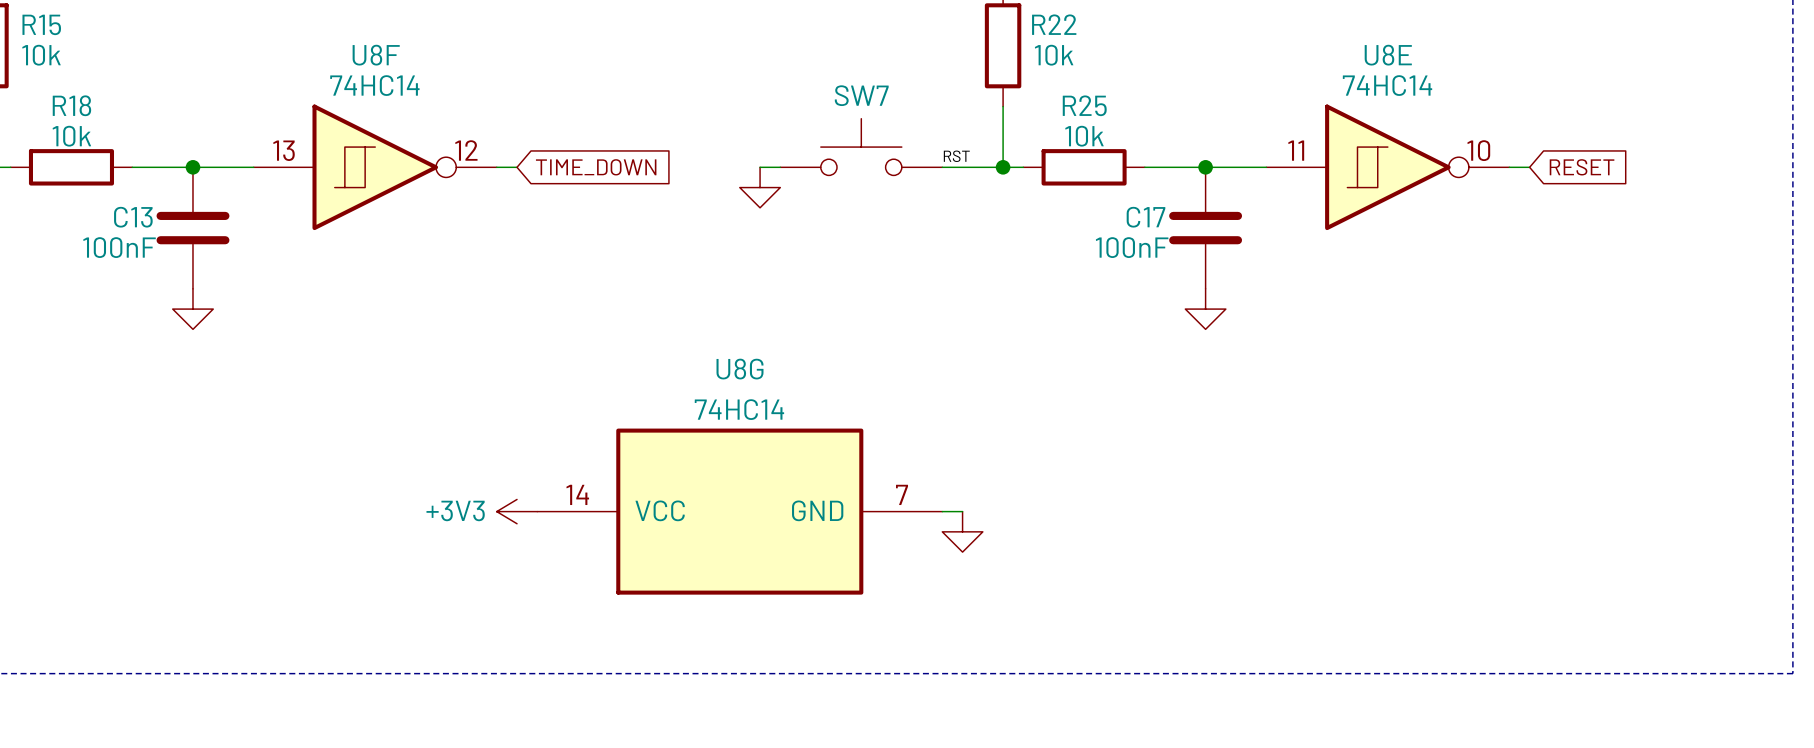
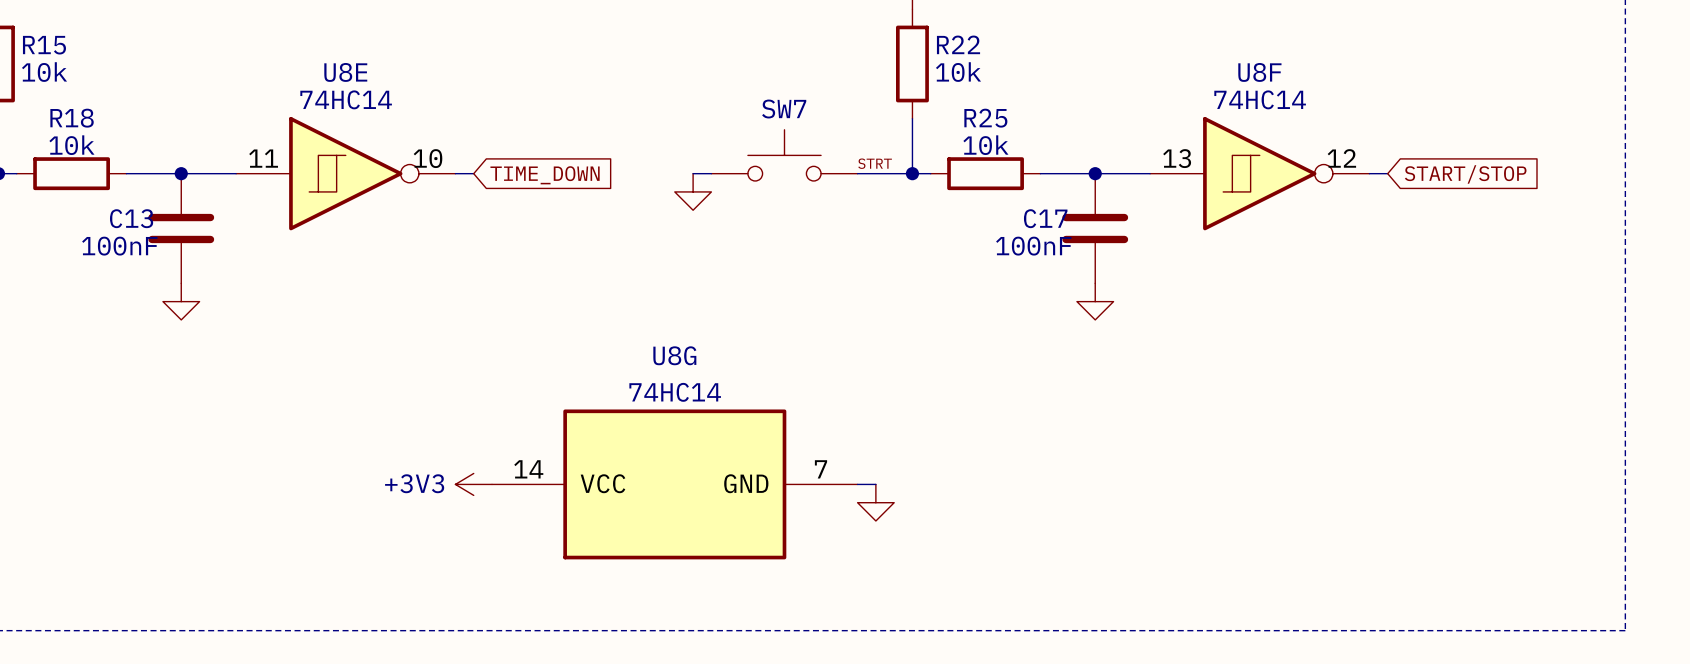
label: RST (956, 156) -> STRT (875, 163)
U8F position: (375, 167) -> (1259, 173)
U8E position: (1387, 167) -> (345, 173)
global label: RESET (1582, 167) -> START/STOP (1465, 174)

